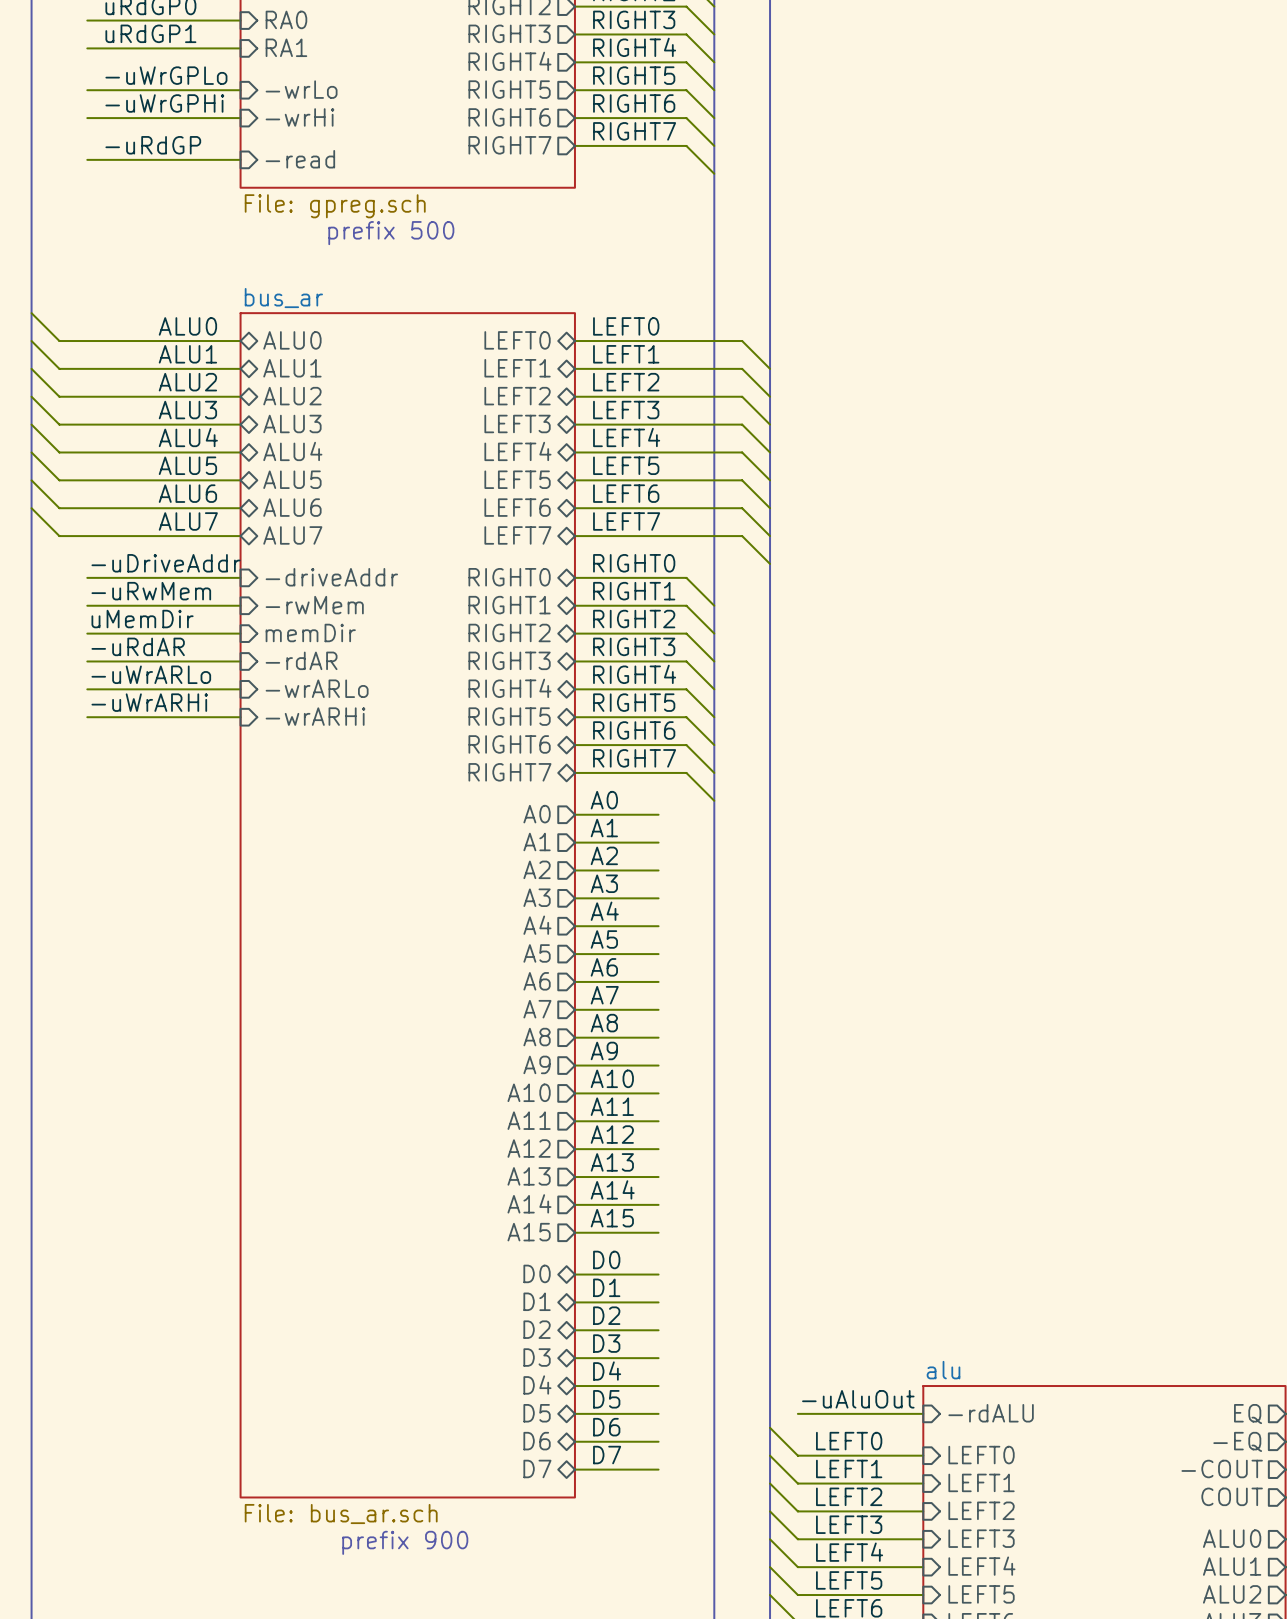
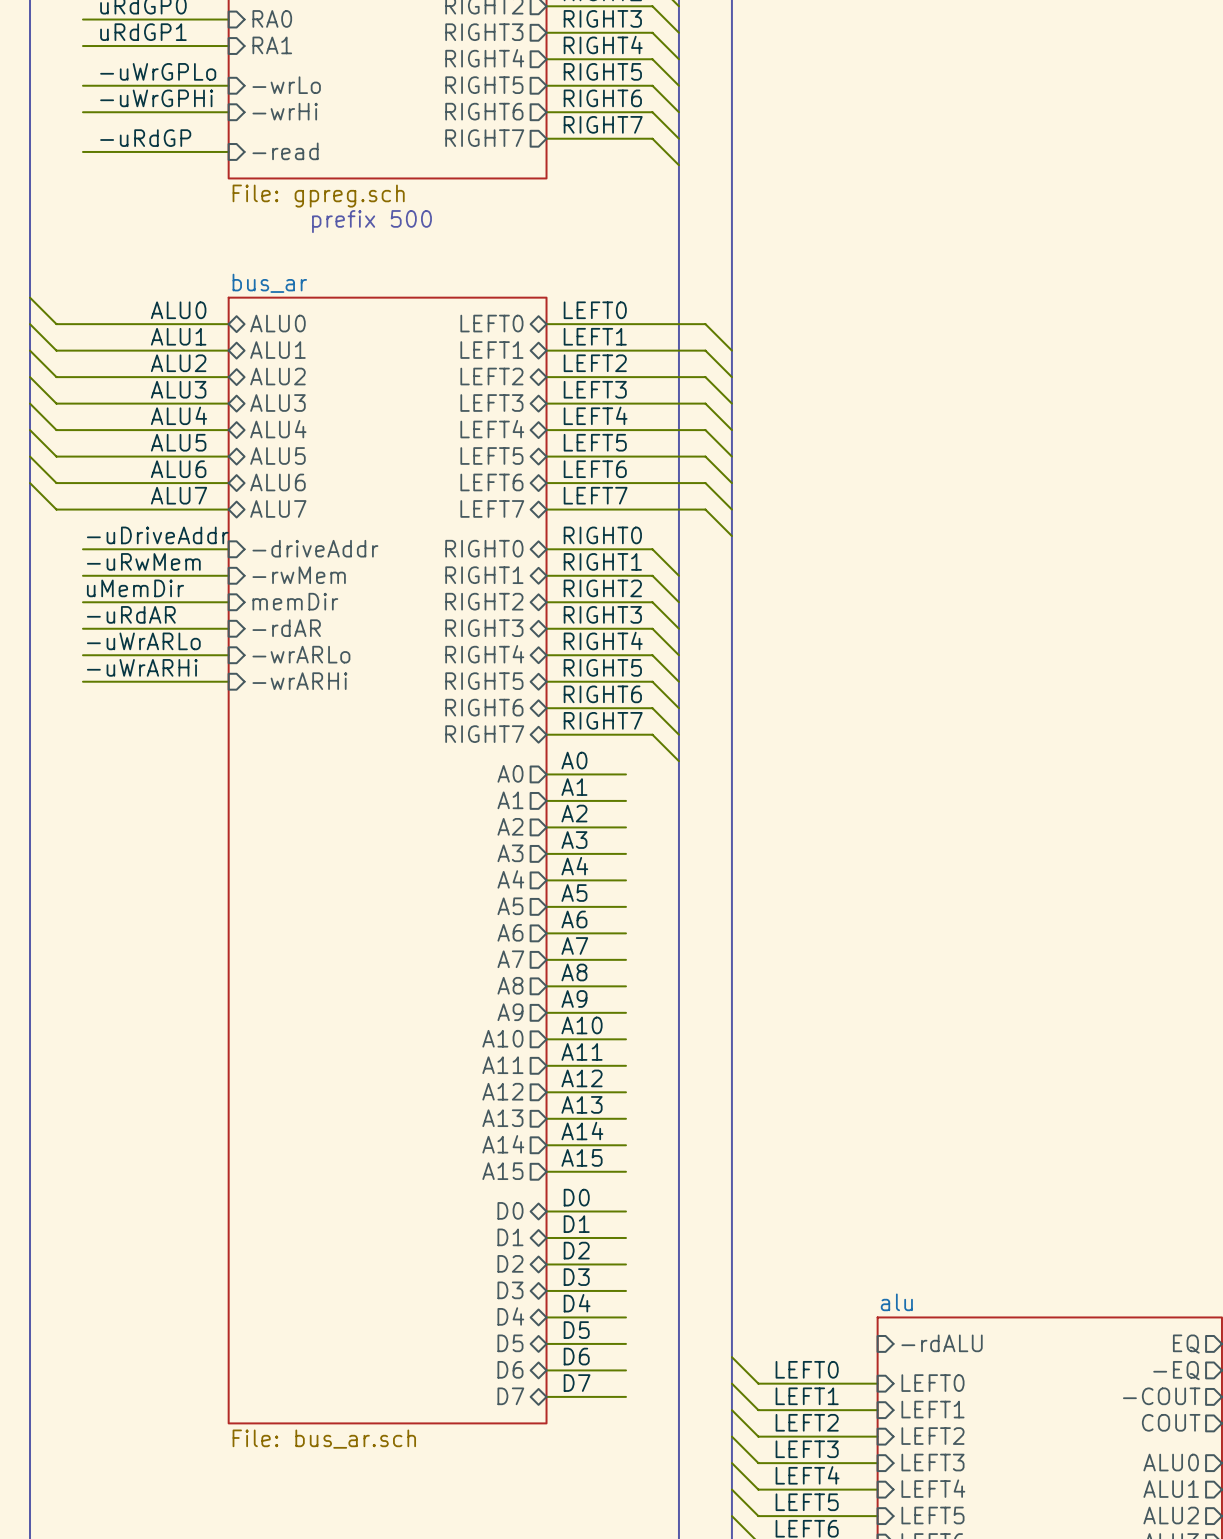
label: -uAluOut (858, 1399) -> none
wire: (797, 1413) (923, 1413) -> none
text: prefix 900 (405, 1542) -> none

